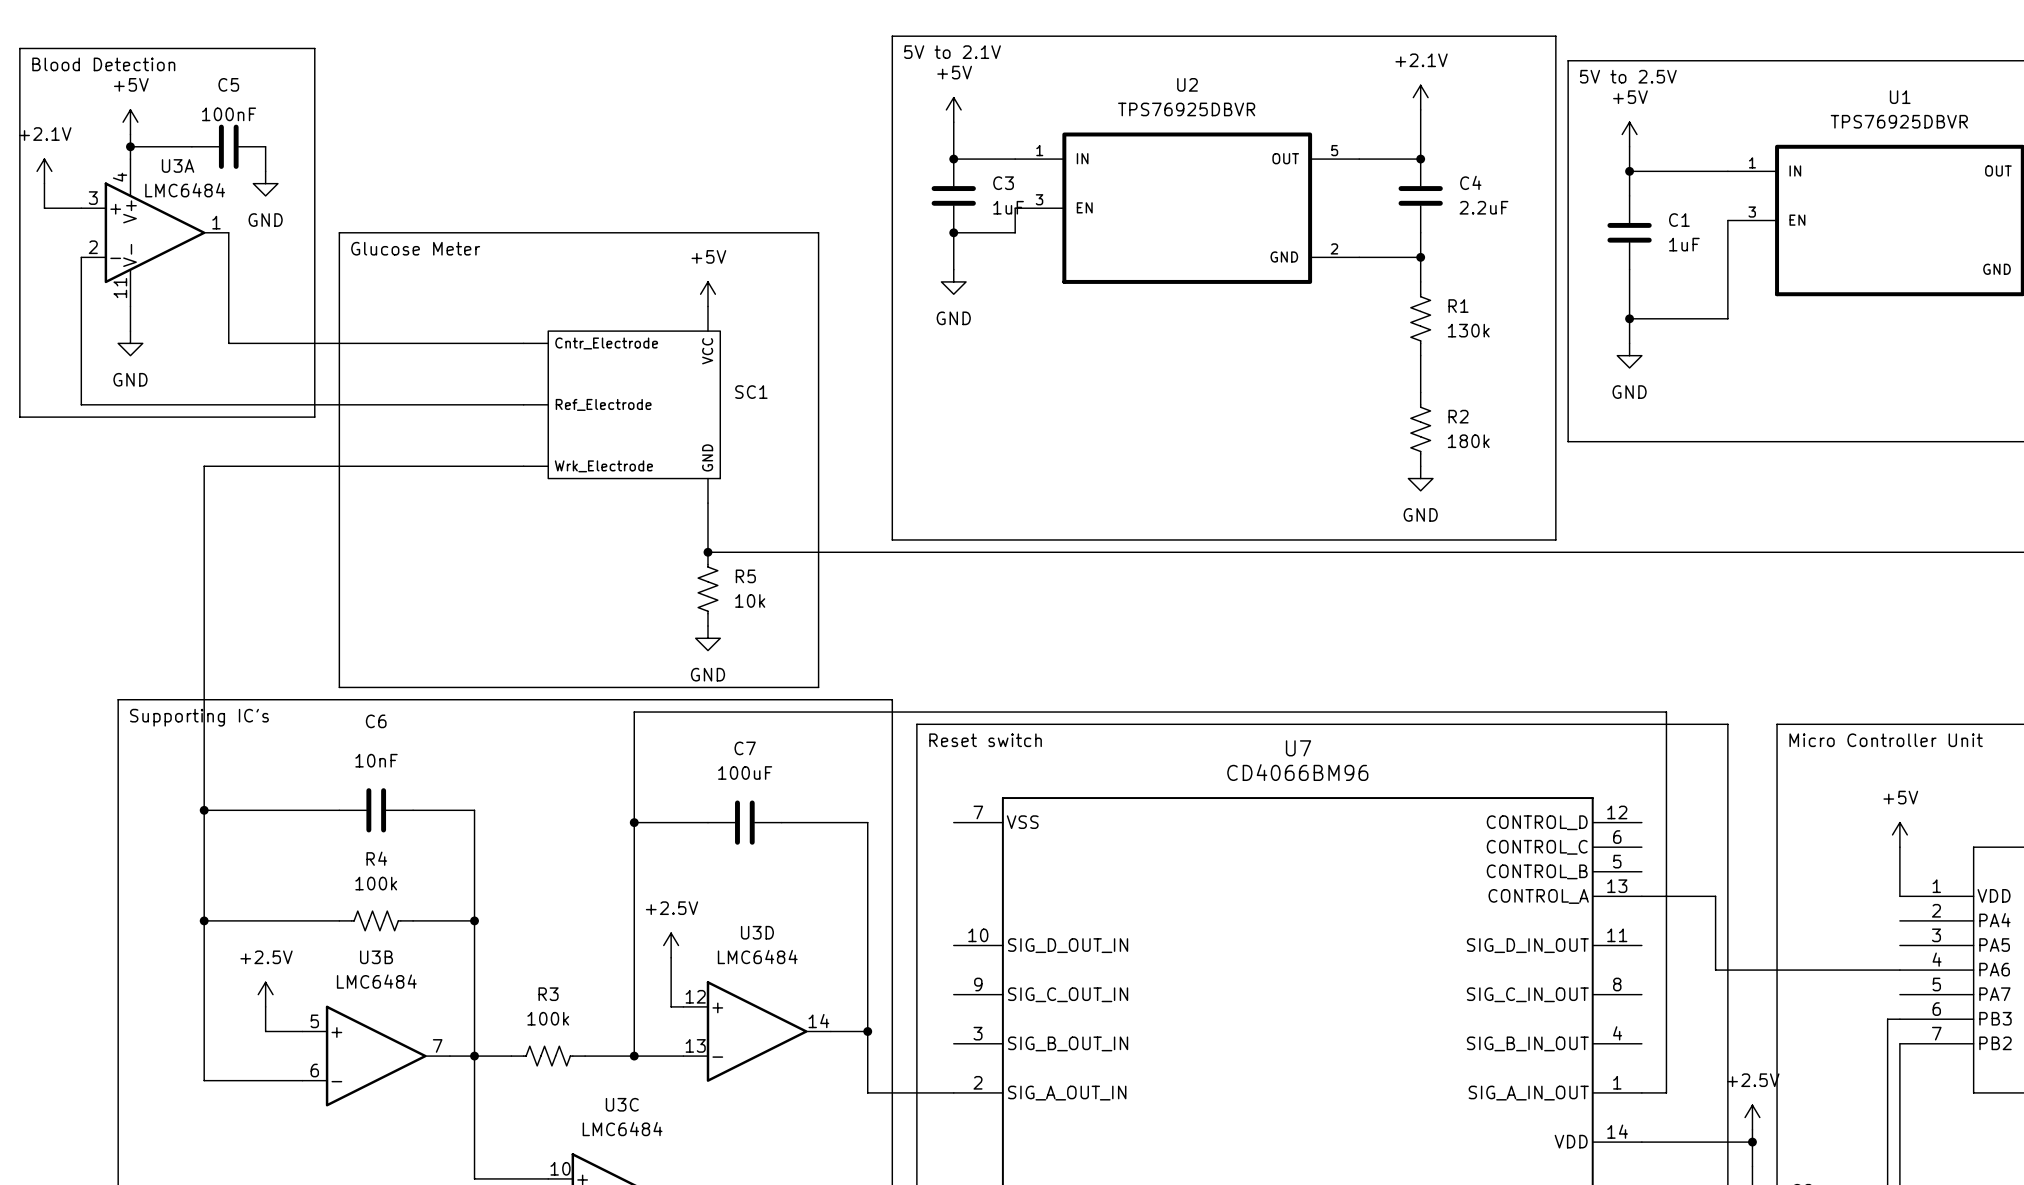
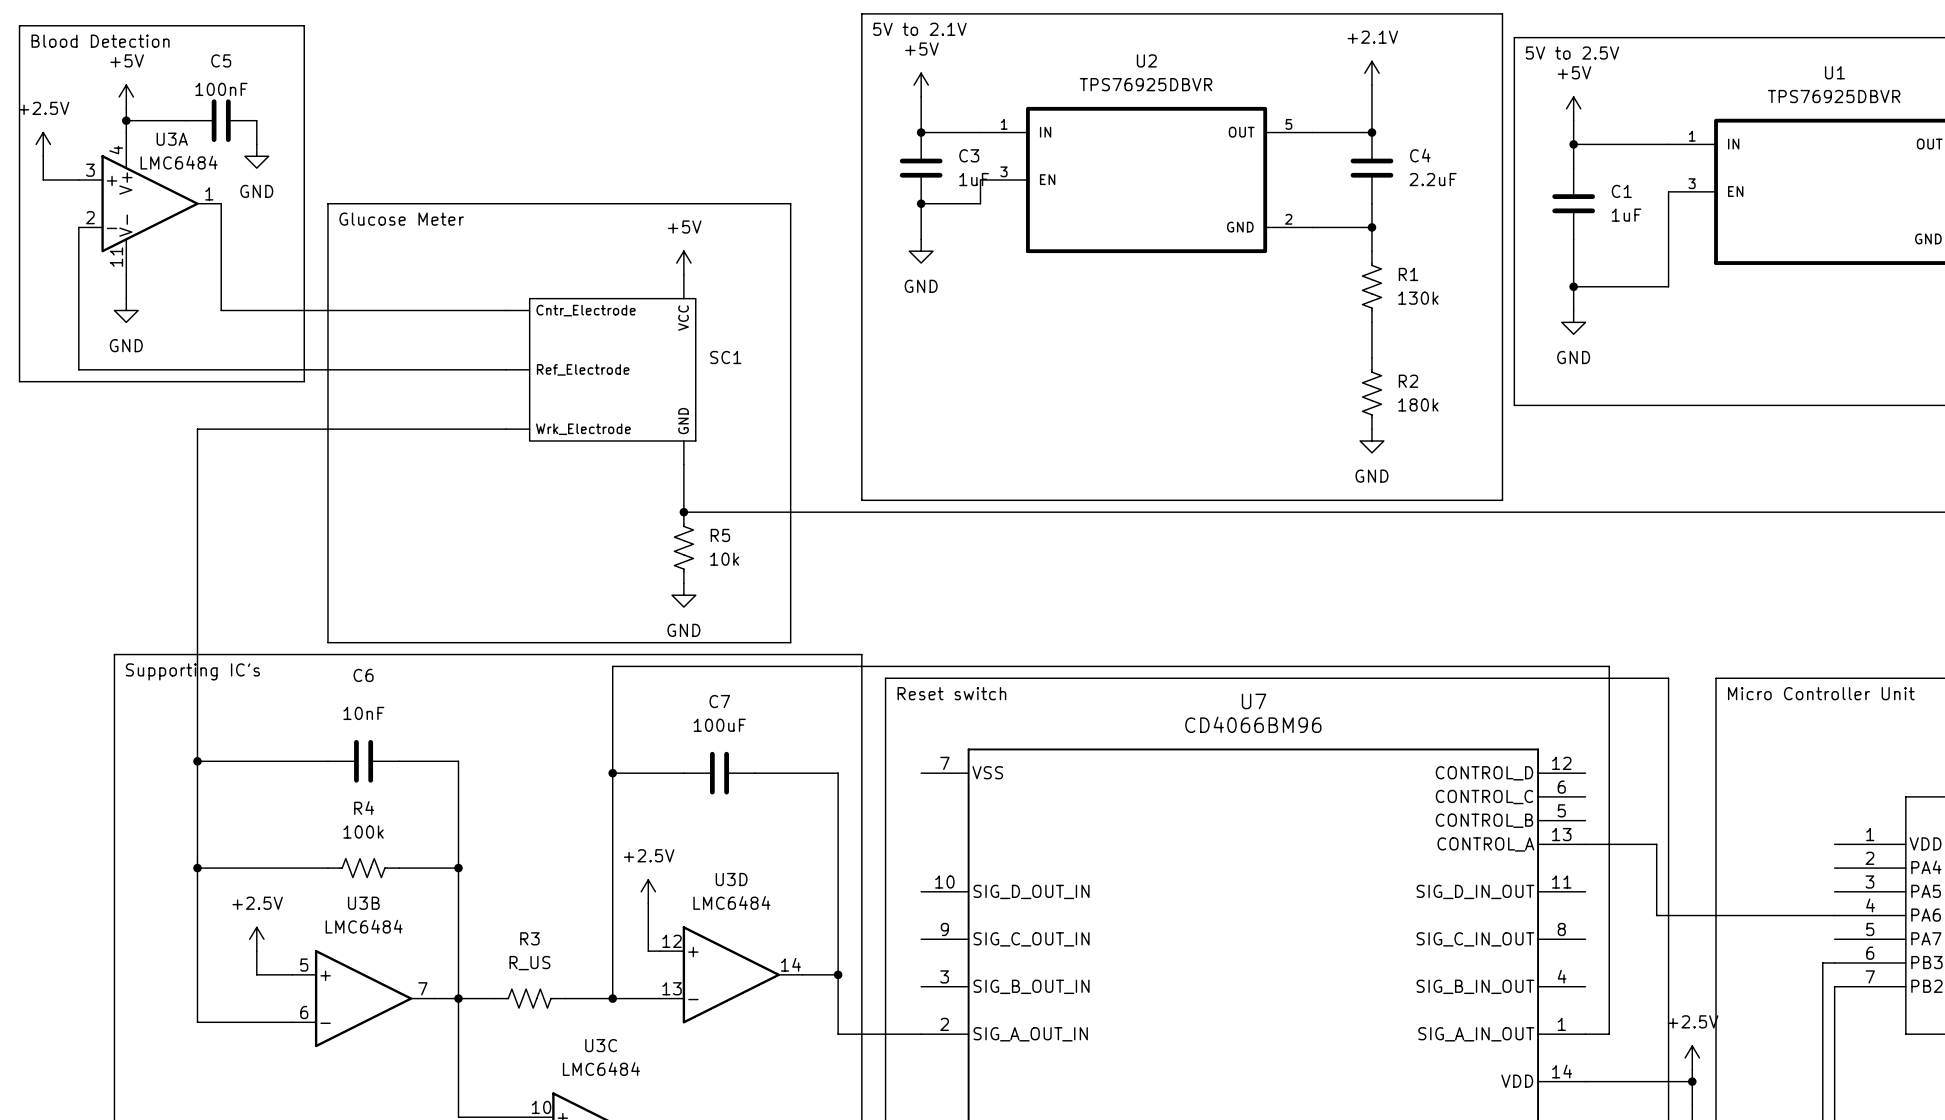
power symbol: +2.1V (44, 171) -> +2.5V (43, 144)
power symbol: +5V (1899, 834) -> none
wire: (1899, 847) (1899, 896) -> none
R3 value: 100k (548, 1018) -> R_US (529, 963)

